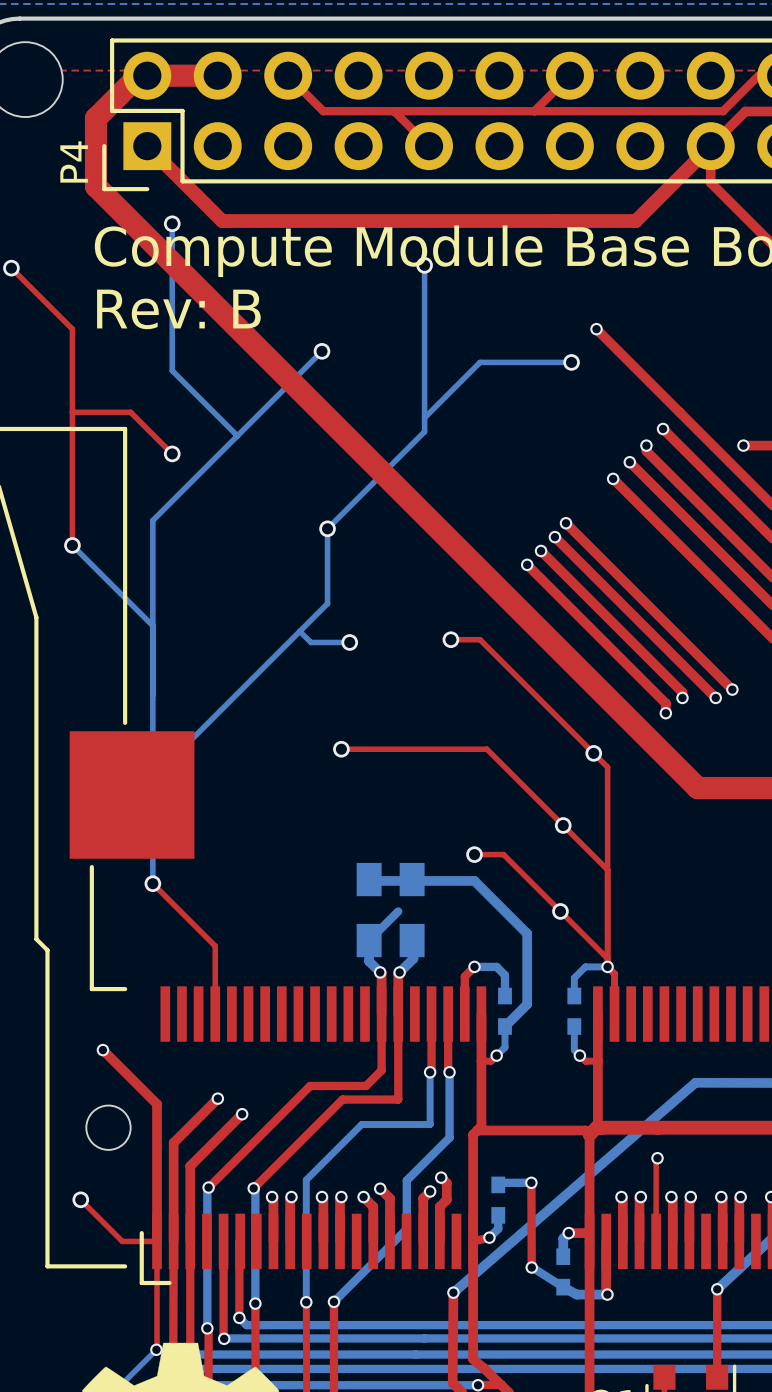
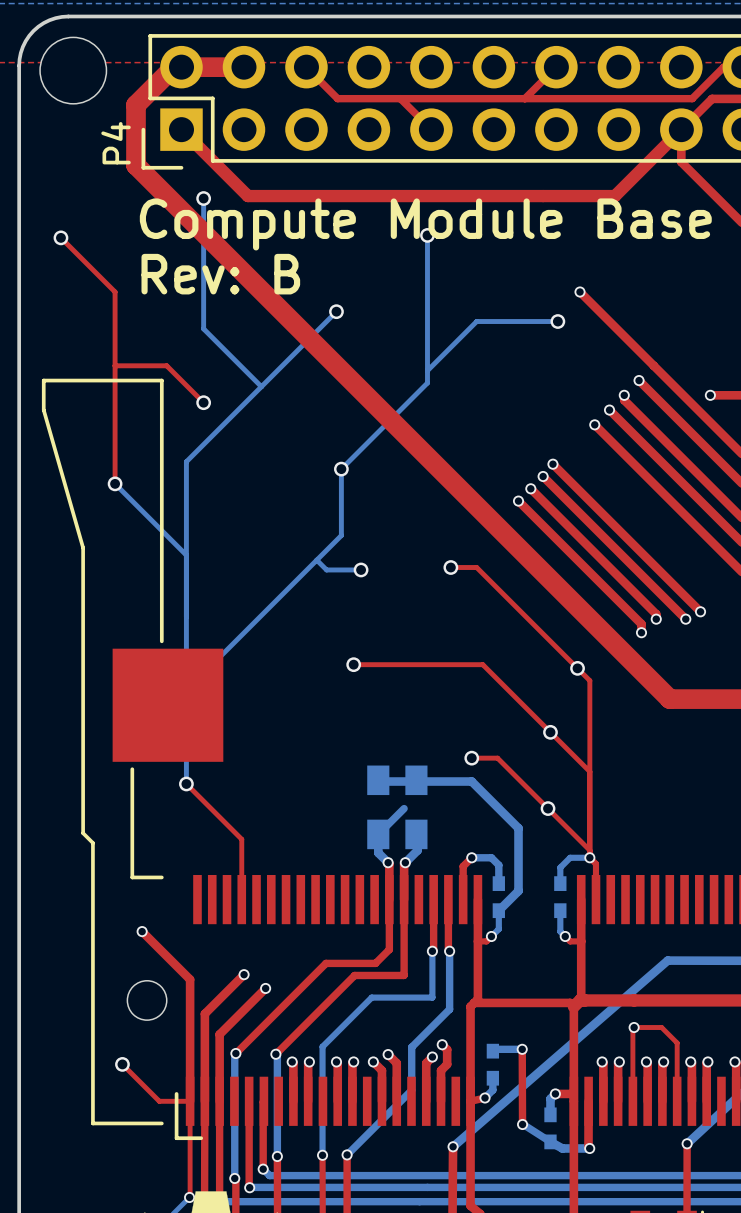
top track: none -> (634, 1027) (661, 1027) (677, 1043) (677, 1101)

